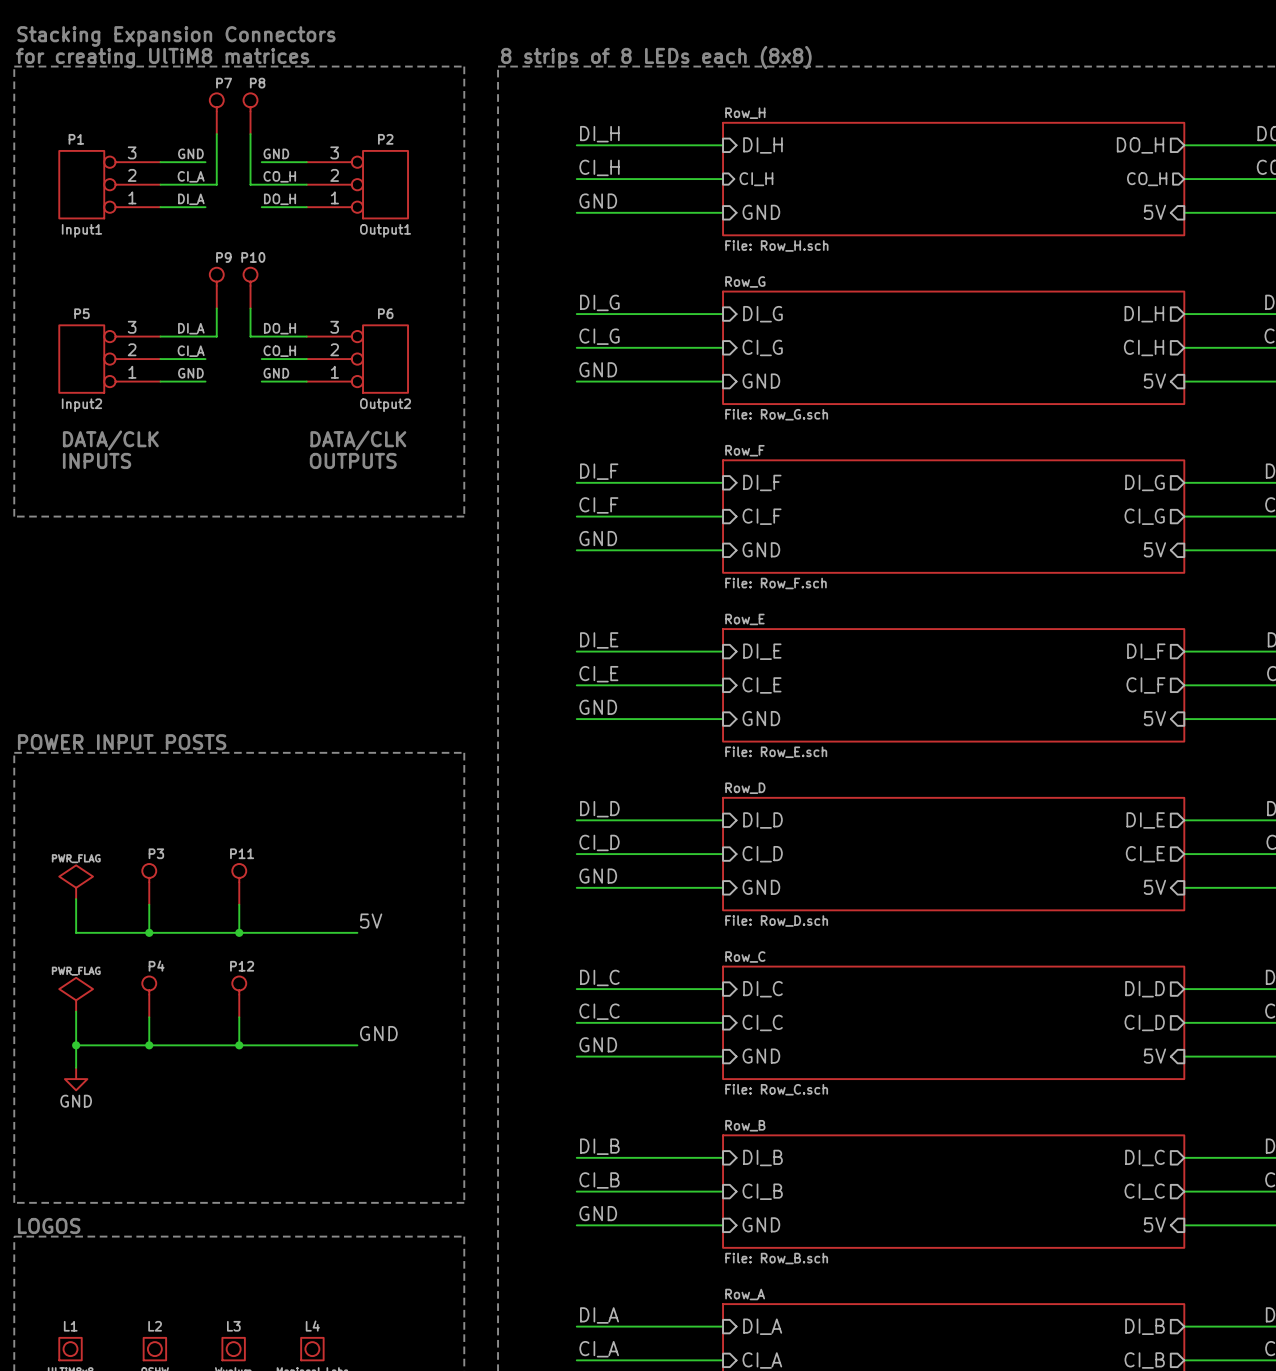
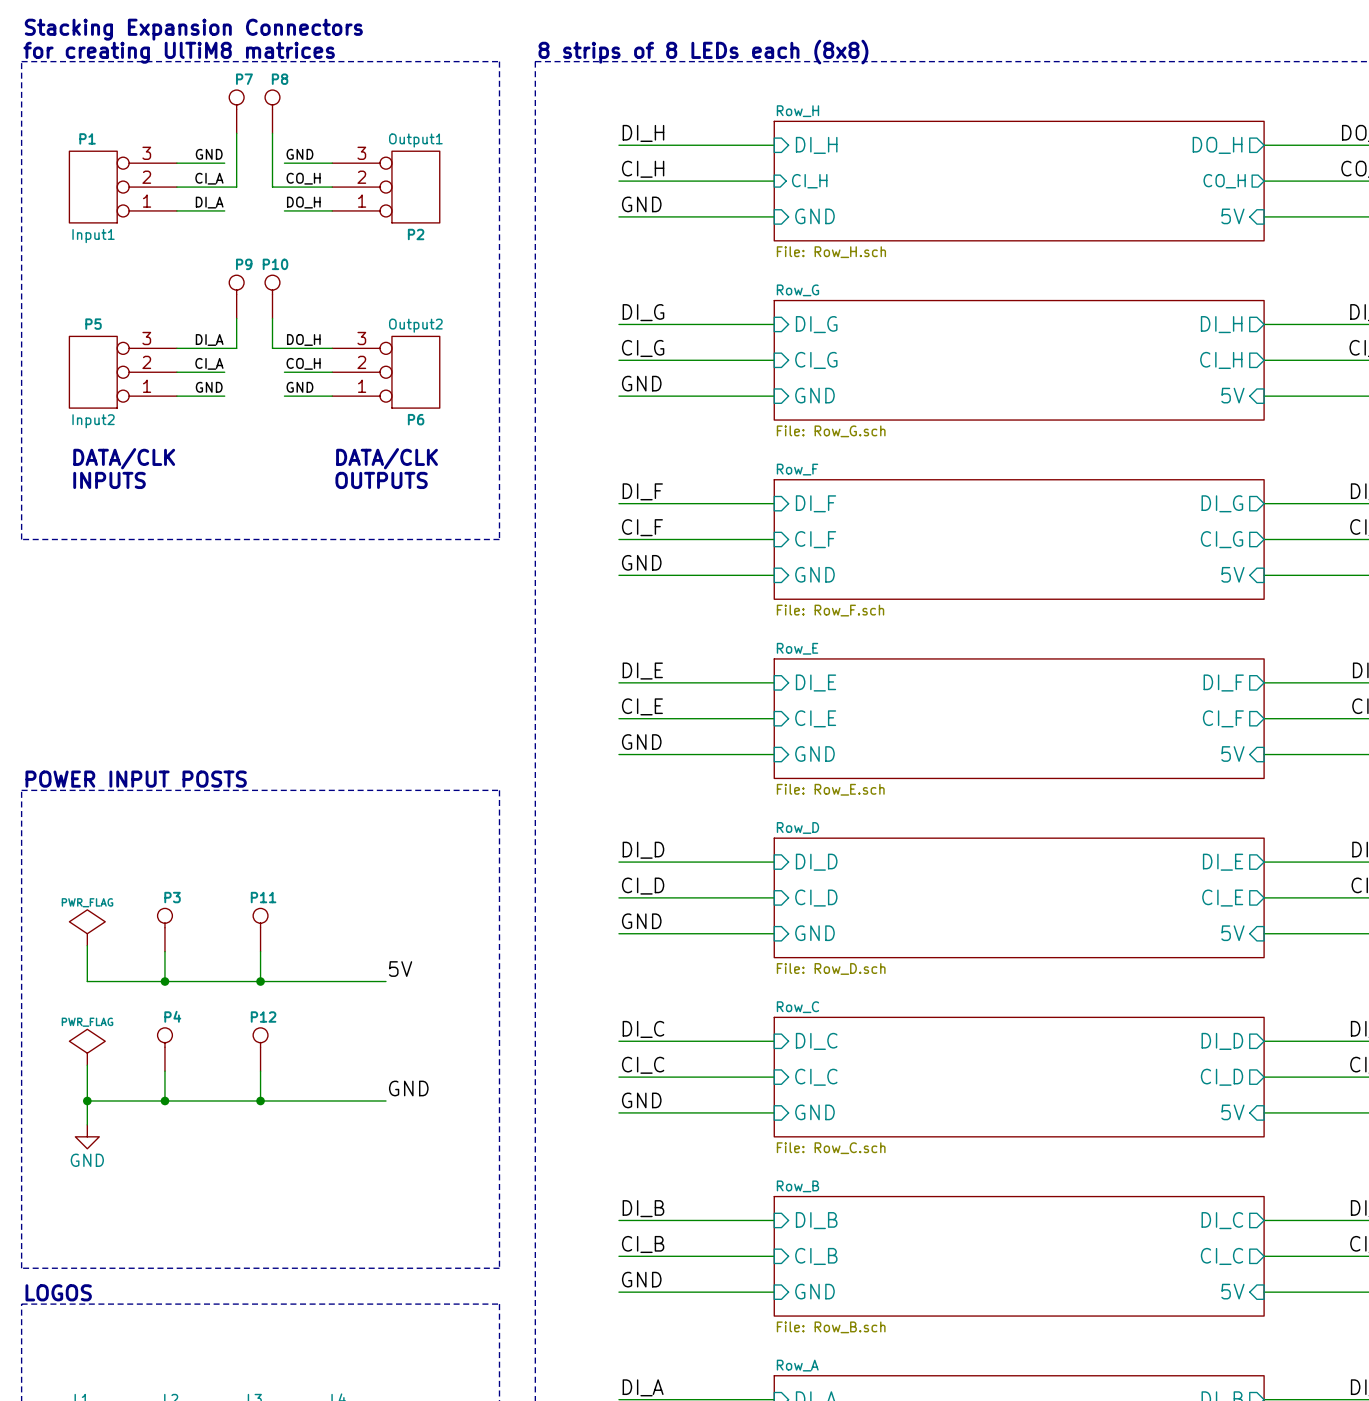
P2 name position: P2 (385, 139) -> P2 (416, 234)
P2 value position: Output1 (385, 230) -> Output1 (415, 140)
P6 name position: P6 (385, 313) -> P6 (416, 419)
P6 value position: Output2 (385, 405) -> Output2 (415, 325)

